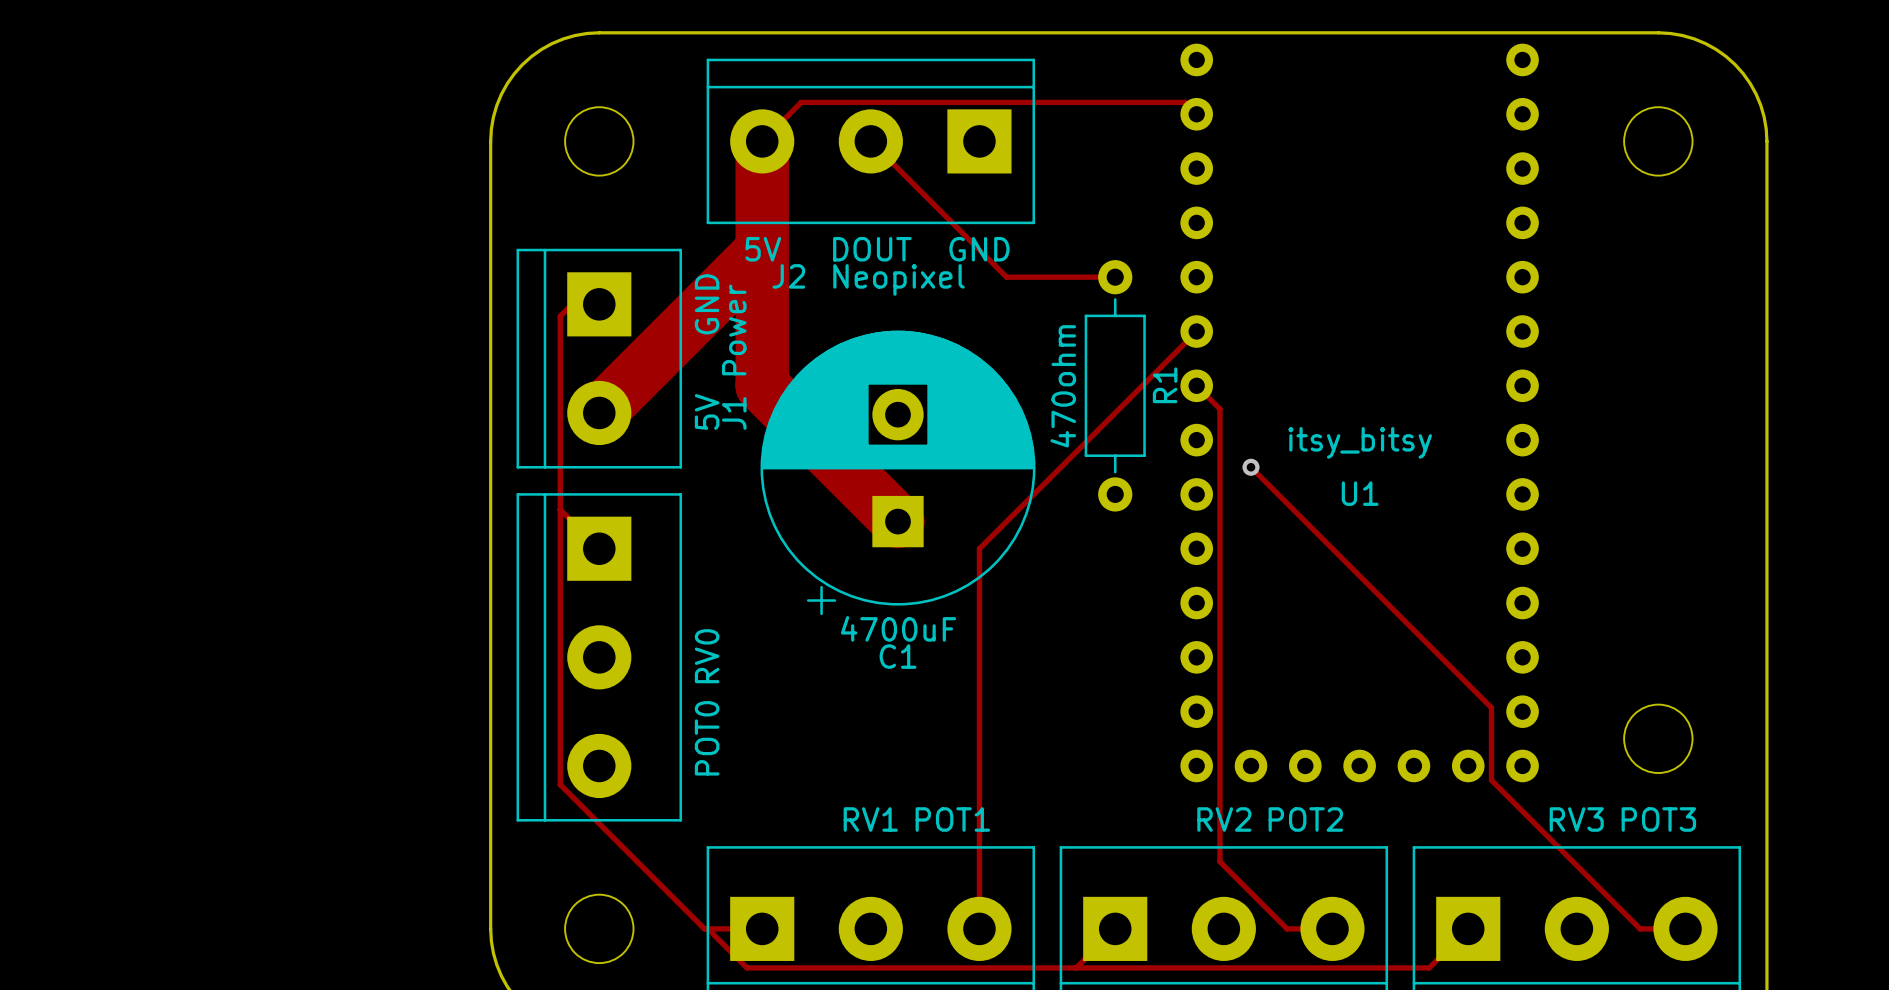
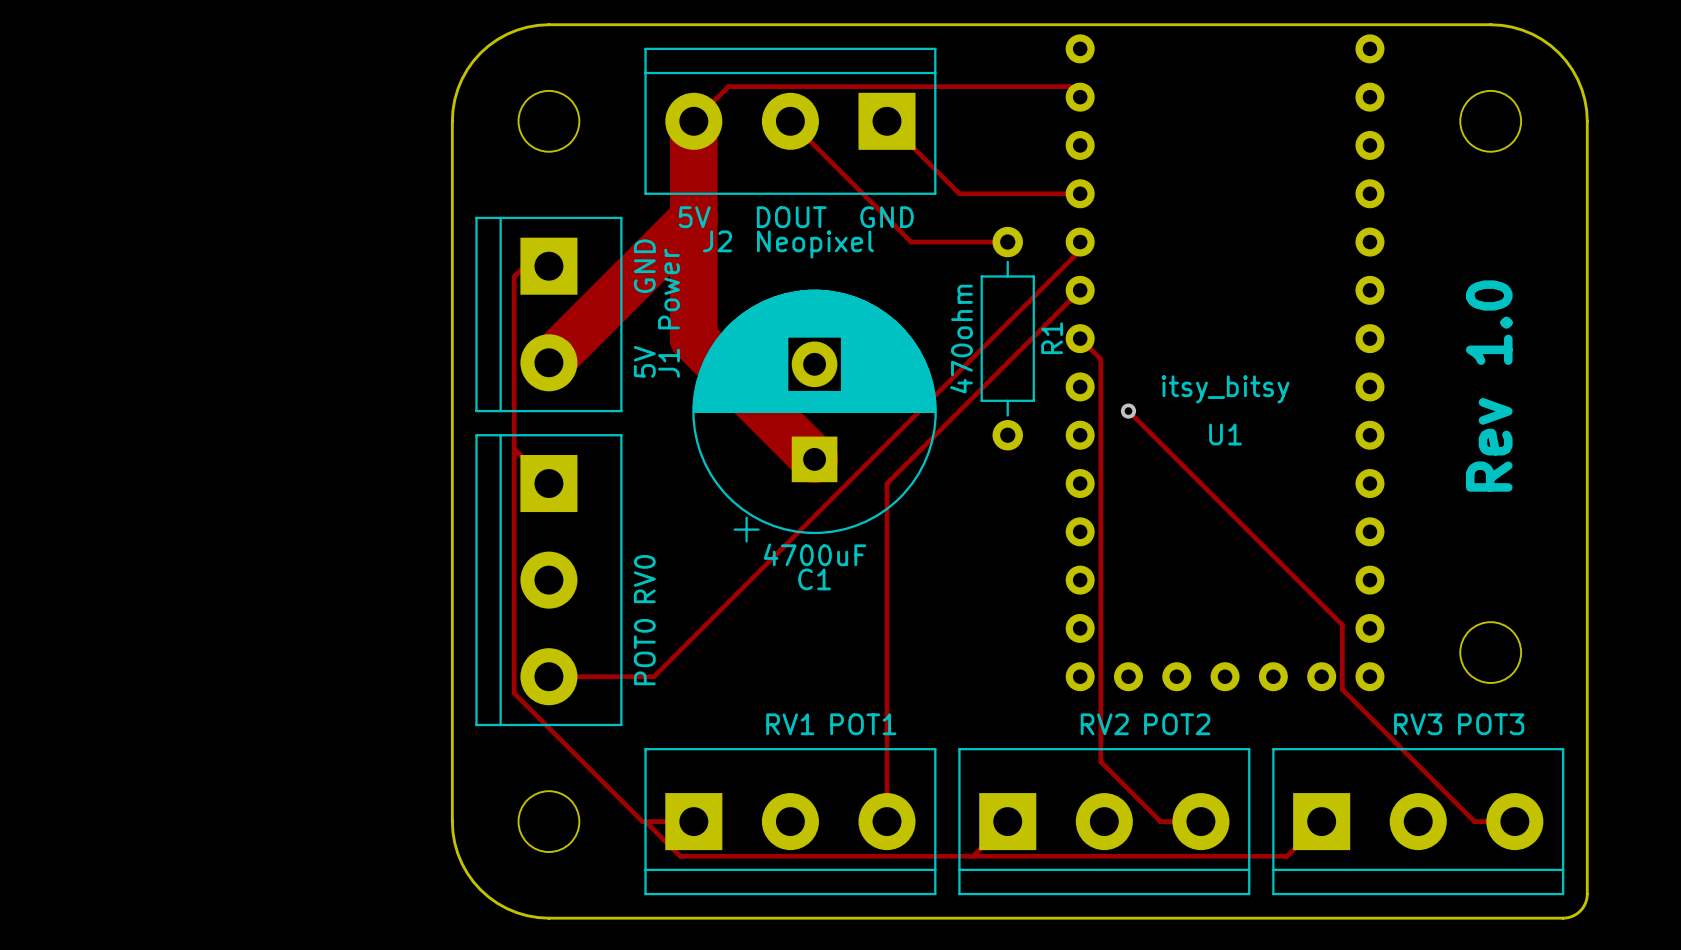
track: none -> (887, 121) (959, 193) (1080, 193)
track: none -> (1080, 242) (1080, 250) (653, 676) (548, 676)
text: none -> Rev 1.0 (1489, 386)

